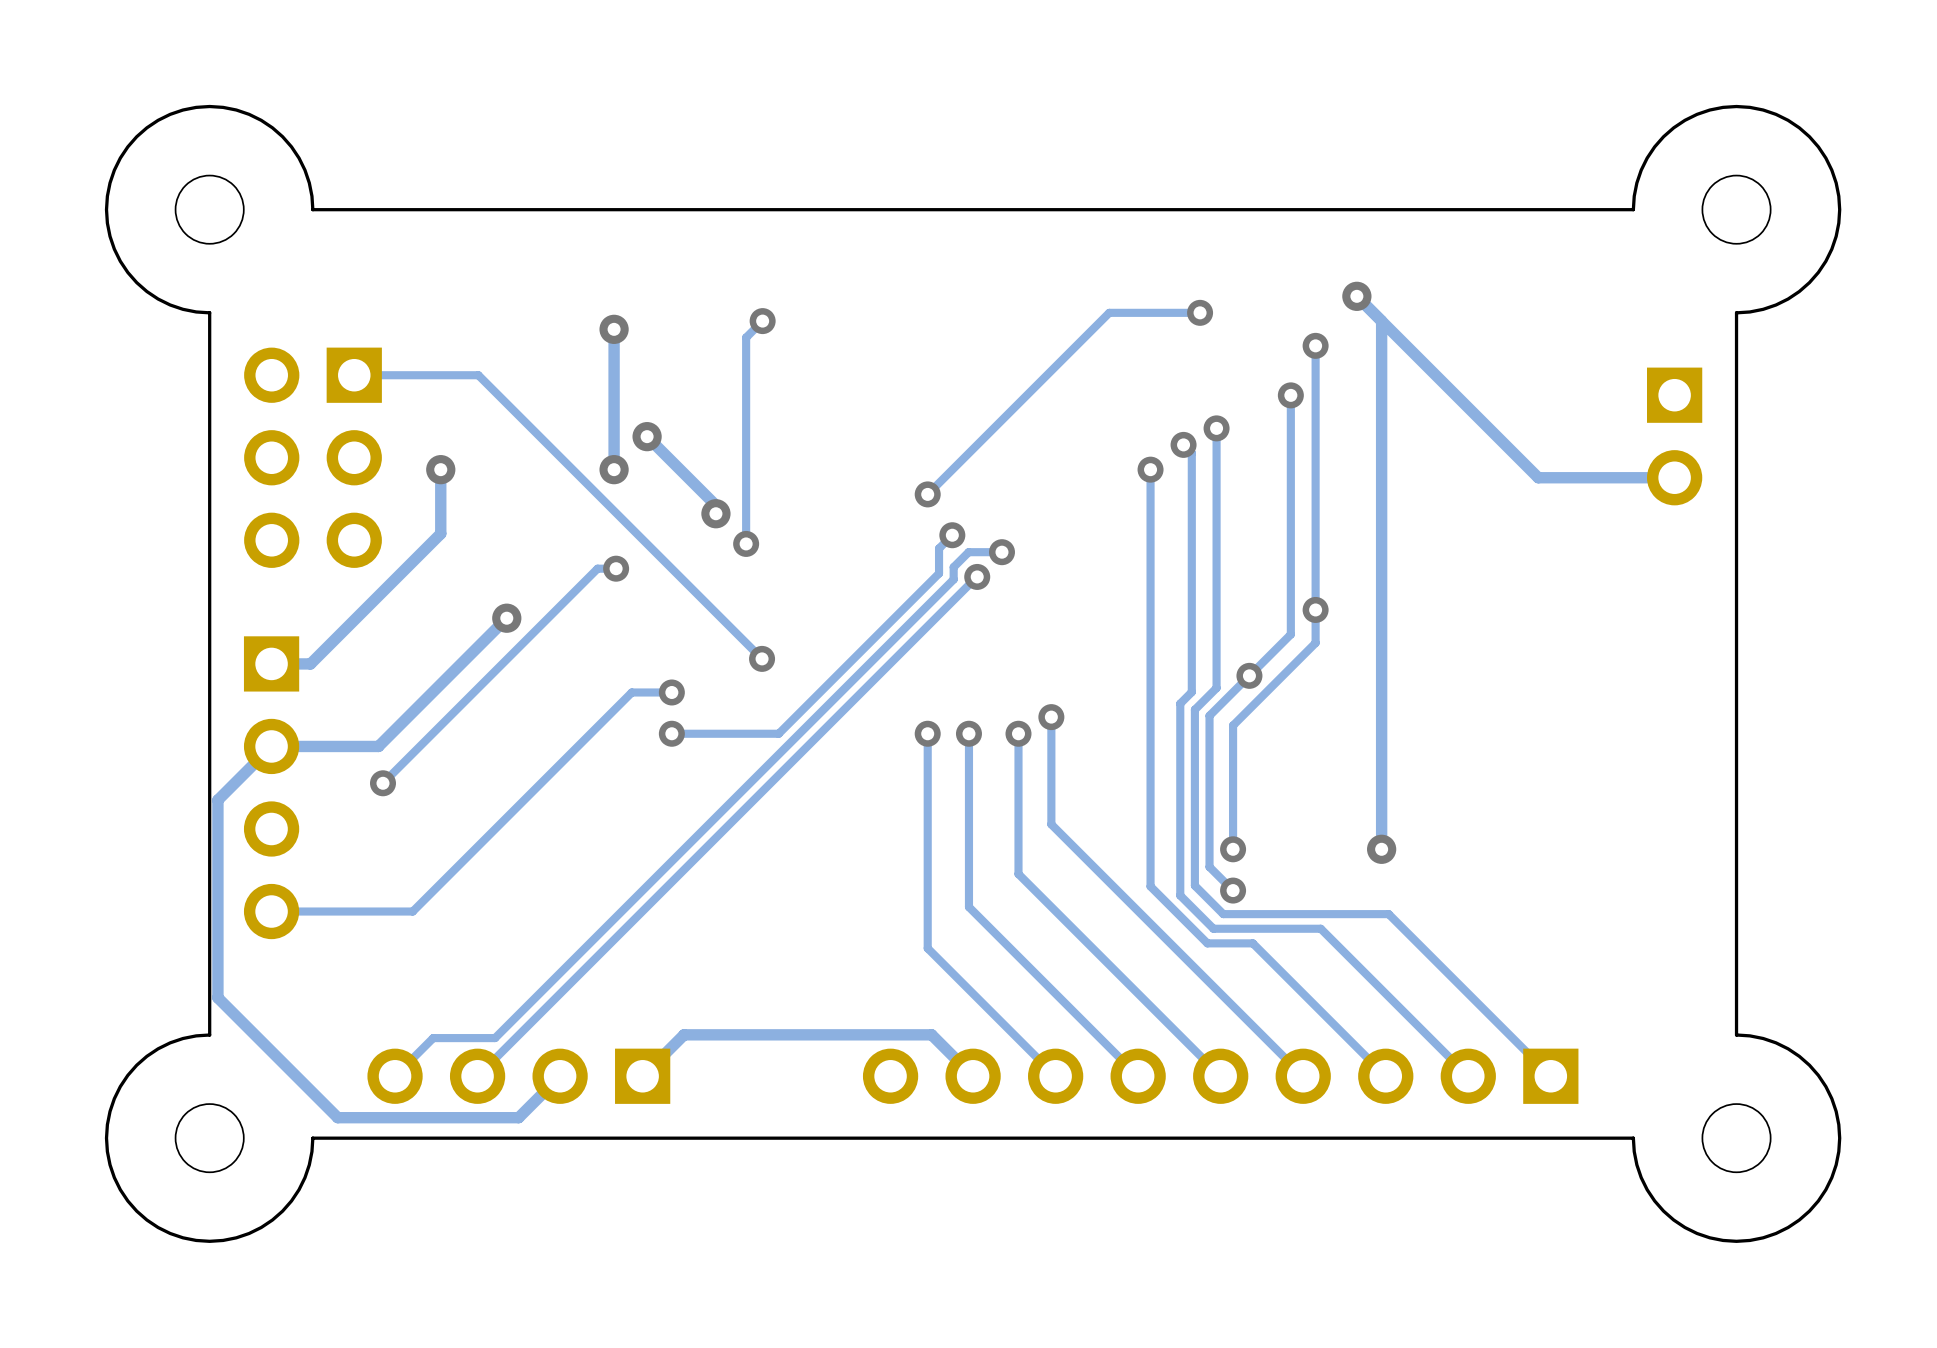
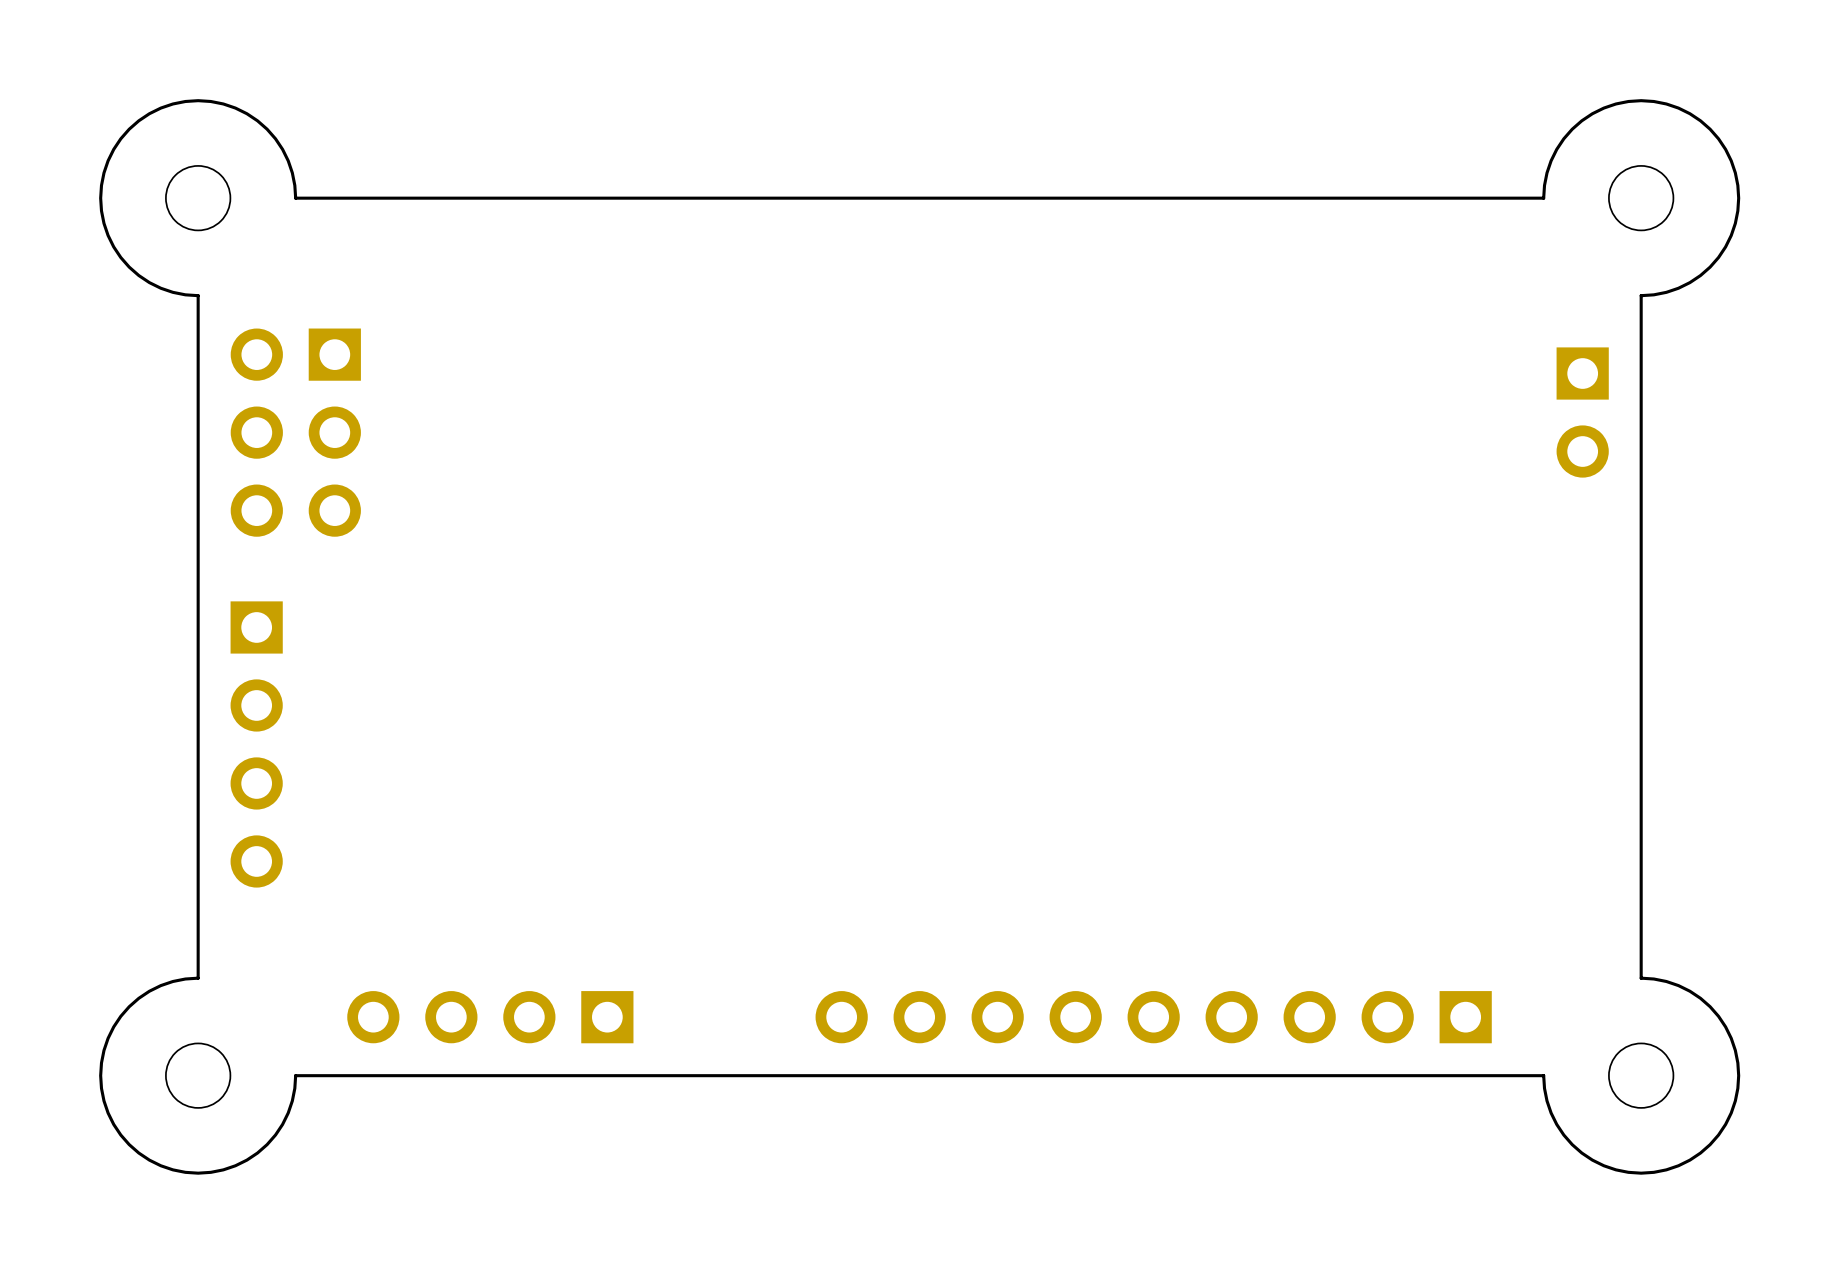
track: (1356, 296) (1538, 477) (1674, 477) -> none
via: (1356, 296) -> none
track: (1200, 312) (1109, 312) (927, 494) -> none
via: (1200, 312) -> none
track: (762, 321) (746, 337) (746, 543) -> none
via: (762, 321) -> none
track: (1381, 321) (1381, 849) -> none
track: (614, 329) (614, 469) -> none
via: (614, 329) -> none
track: (1315, 345) (1315, 642) (1233, 725) (1233, 849) -> none
via: (1315, 345) -> none
track: (354, 375) (478, 375) (762, 658) -> none
track: (1290, 395) (1290, 634) (1209, 715) (1209, 867) (1233, 890) -> none
via: (1290, 395) -> none
track: (1216, 428) (1216, 688) (1194, 709) (1194, 885) (1223, 914) (1388, 914) (1550, 1076) -> none
via: (1216, 428) -> none
track: (647, 436) (715, 505) (715, 513) -> none
via: (647, 436) -> none
track: (1183, 444) (1191, 453) (1191, 692) (1180, 703) (1180, 895) (1213, 928) (1320, 928) (1468, 1076) -> none
via: (1183, 444) -> none
track: (440, 469) (440, 533) (310, 663) (271, 663) -> none
via: (440, 469) -> none
via: (614, 469) -> none
track: (1150, 469) (1150, 886) (1207, 943) (1252, 943) (1385, 1076) -> none
via: (1150, 469) -> none
via: (927, 494) -> none
via: (715, 513) -> none
track: (952, 535) (939, 548) (939, 573) (778, 733) (671, 733) -> none
via: (952, 535) -> none
via: (746, 543) -> none
track: (1001, 552) (968, 552) (953, 567) (953, 579) (495, 1038) (433, 1038) (395, 1076) -> none
via: (1001, 552) -> none
track: (616, 568) (597, 568) (382, 783) -> none
via: (616, 568) -> none
track: (976, 576) (477, 1076) -> none
via: (977, 576) -> none
via: (1315, 609) -> none
track: (506, 618) (378, 746) (271, 746) (217, 800) (217, 997) (337, 1117) (518, 1117) (560, 1076) -> none
via: (506, 618) -> none
via: (762, 658) -> none
via: (1249, 675) -> none
track: (671, 692) (631, 692) (412, 911) (271, 911) -> none
via: (671, 692) -> none
track: (1051, 717) (1051, 824) (1303, 1076) -> none
via: (1051, 717) -> none
via: (671, 733) -> none
track: (927, 733) (927, 948) (1055, 1076) -> none
via: (927, 733) -> none
track: (968, 733) (968, 907) (1138, 1076) -> none
via: (968, 733) -> none
track: (1018, 733) (1018, 874) (1220, 1076) -> none
via: (1018, 733) -> none
via: (382, 783) -> none
via: (1233, 849) -> none
via: (1381, 849) -> none
via: (1233, 890) -> none
track: (973, 1076) (931, 1034) (684, 1034) (642, 1076) -> none

